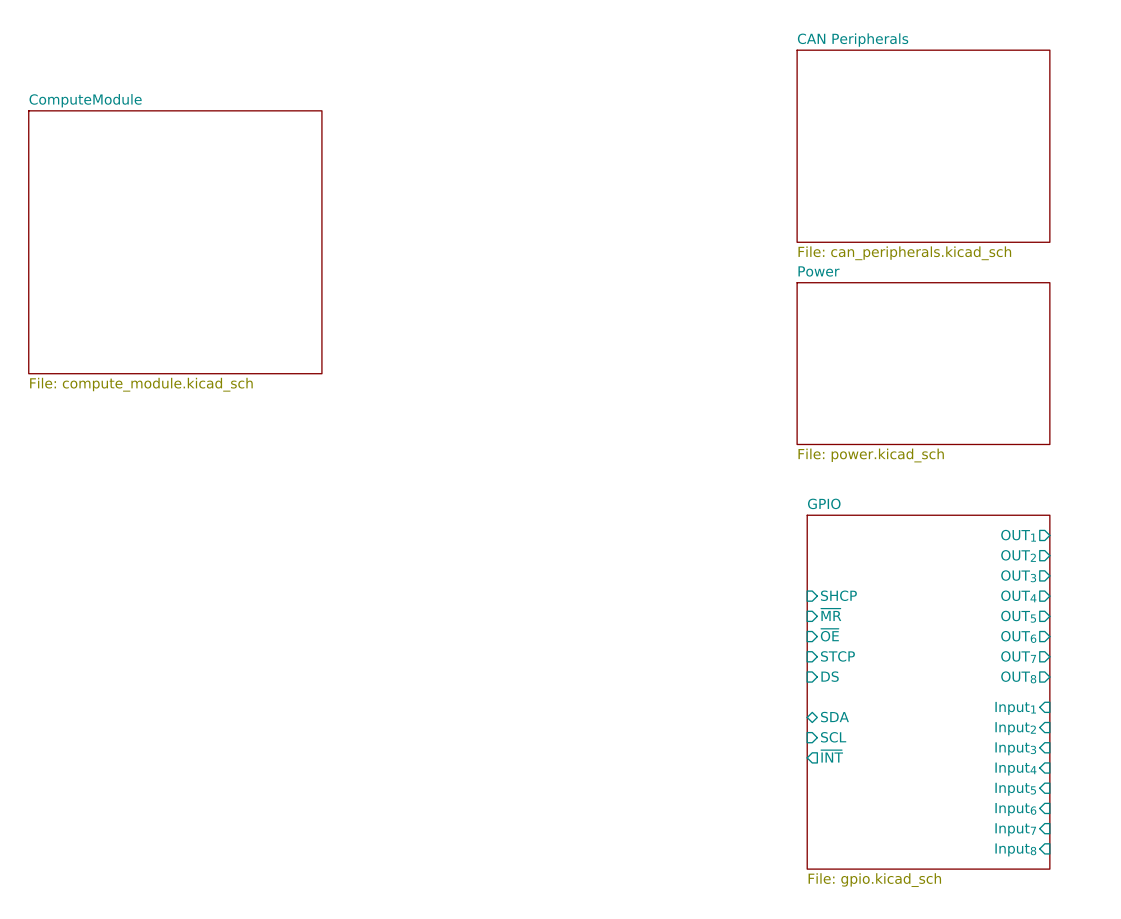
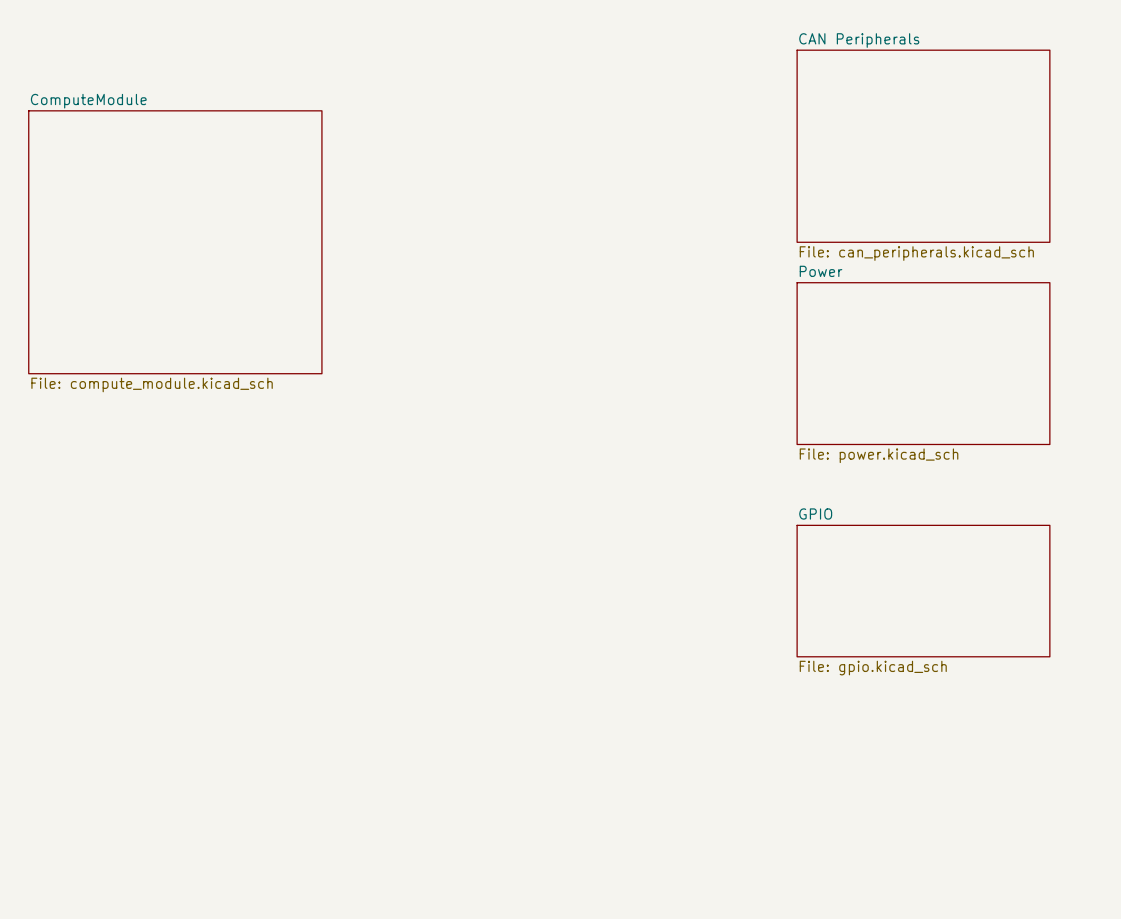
sheet pin: OUT1 (1018, 535) -> none
sheet pin: OUT2 (1018, 555) -> none
sheet pin: OUT3 (1018, 576) -> none
sheet GPIO: none -> File: gpio.kicad_sch (923, 591)
sheet pin: SHCP (838, 595) -> none
sheet pin: OUT4 (1018, 596) -> none
sheet pin: ~{MR} (831, 614) -> none
sheet pin: OUT5 (1018, 616) -> none
sheet pin: ~{OE} (829, 635) -> none
sheet pin: OUT6 (1018, 636) -> none
sheet pin: STCP (837, 656) -> none
sheet pin: OUT7 (1018, 657) -> none
sheet pin: DS (830, 676) -> none
sheet pin: OUT8 (1018, 677) -> none
sheet GPIO: File: gpio.kicad_sch (928, 692) -> none
sheet pin: Input1 (1015, 708) -> none
sheet pin: SDA (834, 717) -> none
sheet pin: Input2 (1015, 728) -> none
sheet pin: SCL (833, 737) -> none
sheet pin: Input3 (1015, 748) -> none
sheet pin: ~{INT} (832, 756) -> none
sheet pin: Input4 (1015, 769) -> none
sheet pin: Input5 (1015, 789) -> none
sheet pin: Input6 (1015, 809) -> none
sheet pin: Input7 (1015, 829) -> none
sheet pin: Input8 (1015, 849) -> none

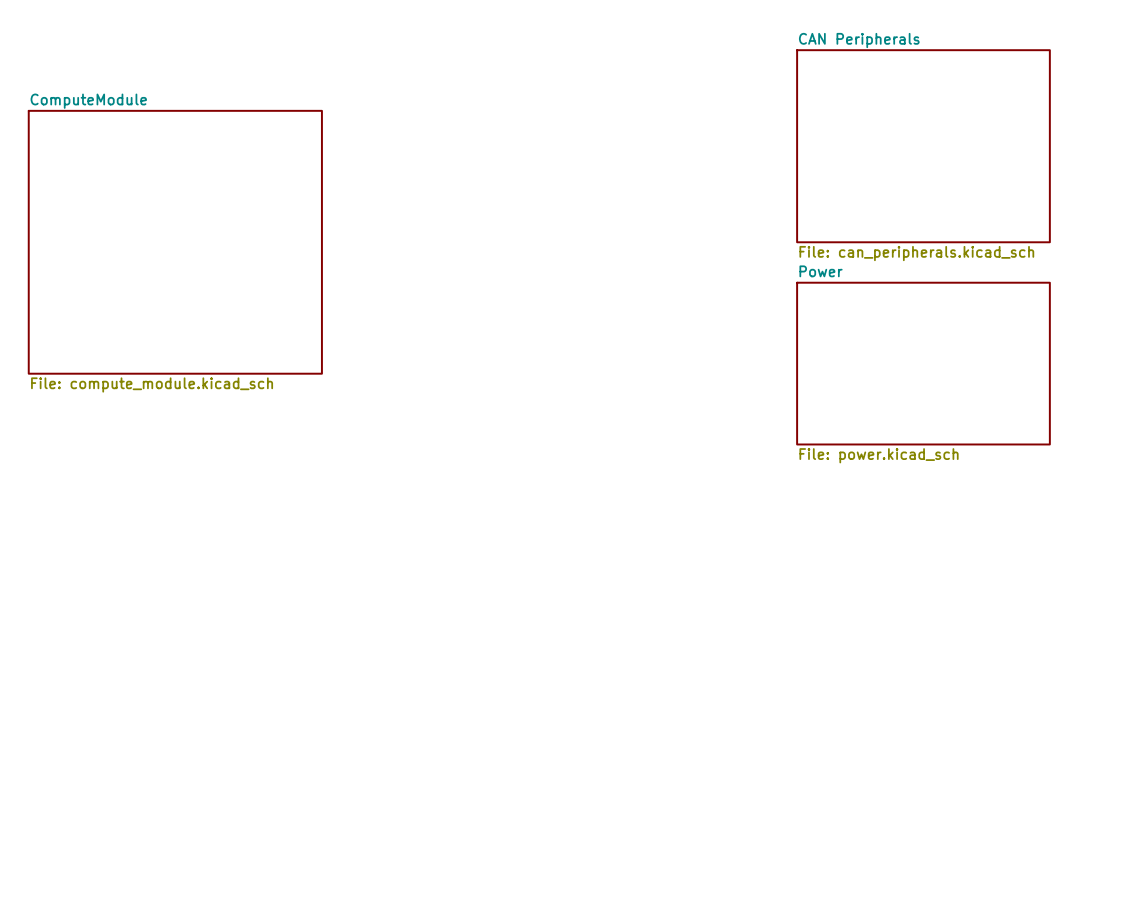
sheet GPIO: File: gpio.kicad_sch (923, 591) -> none

